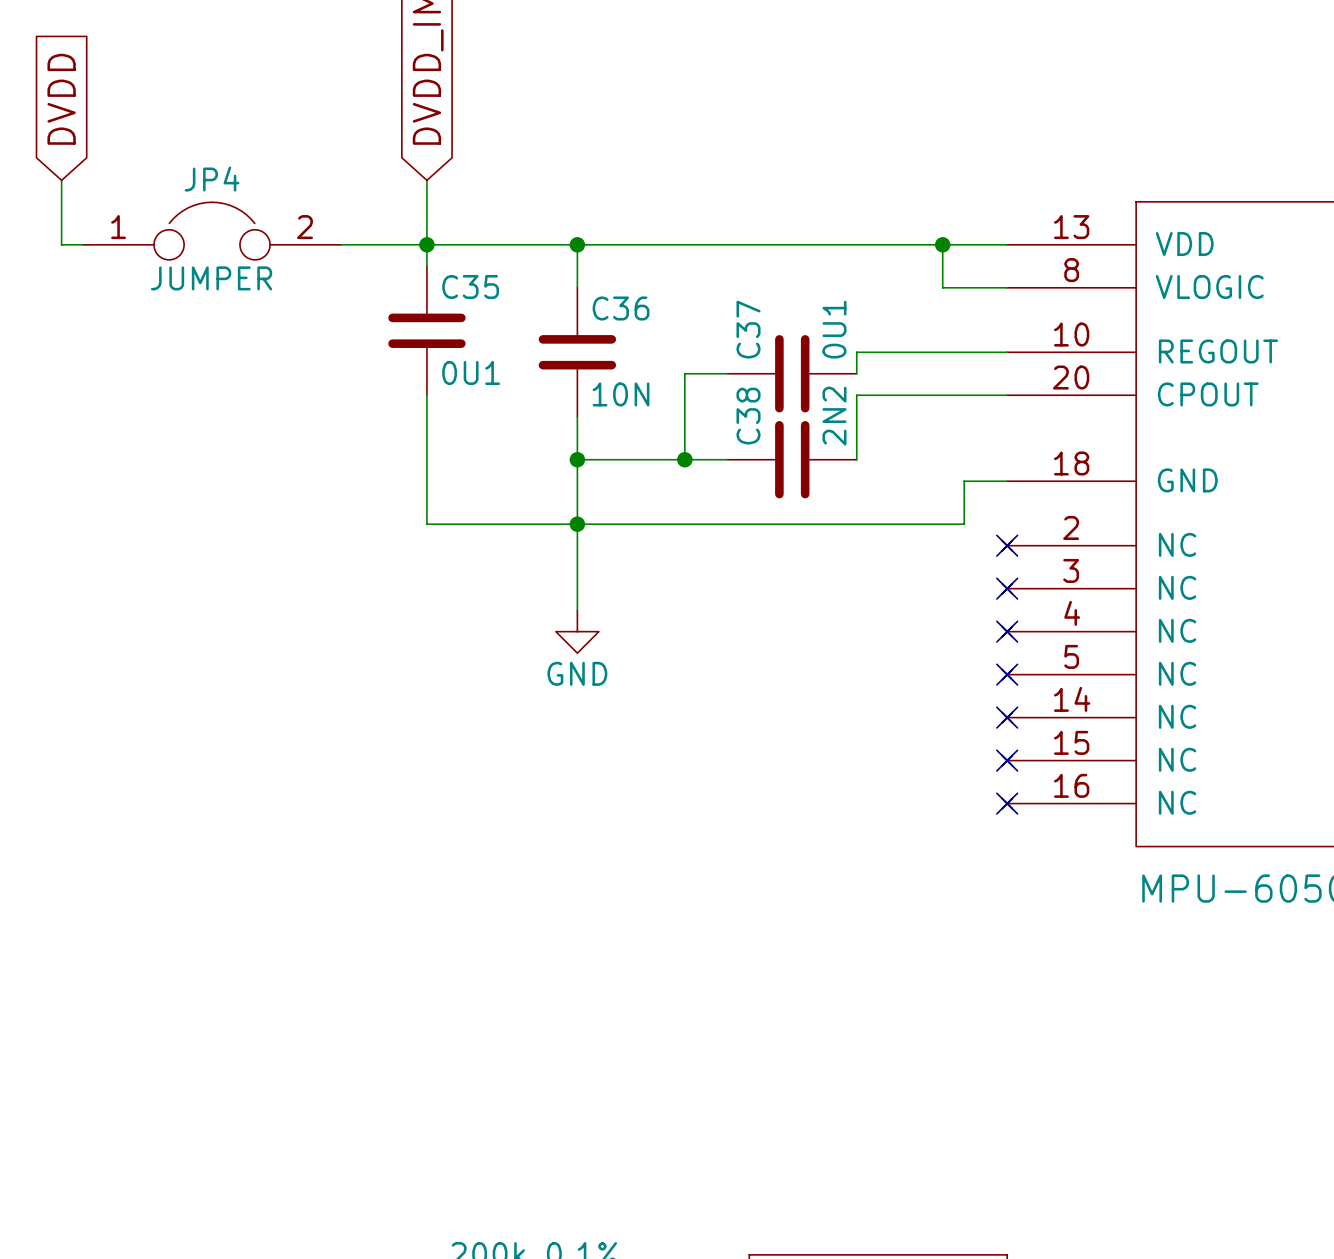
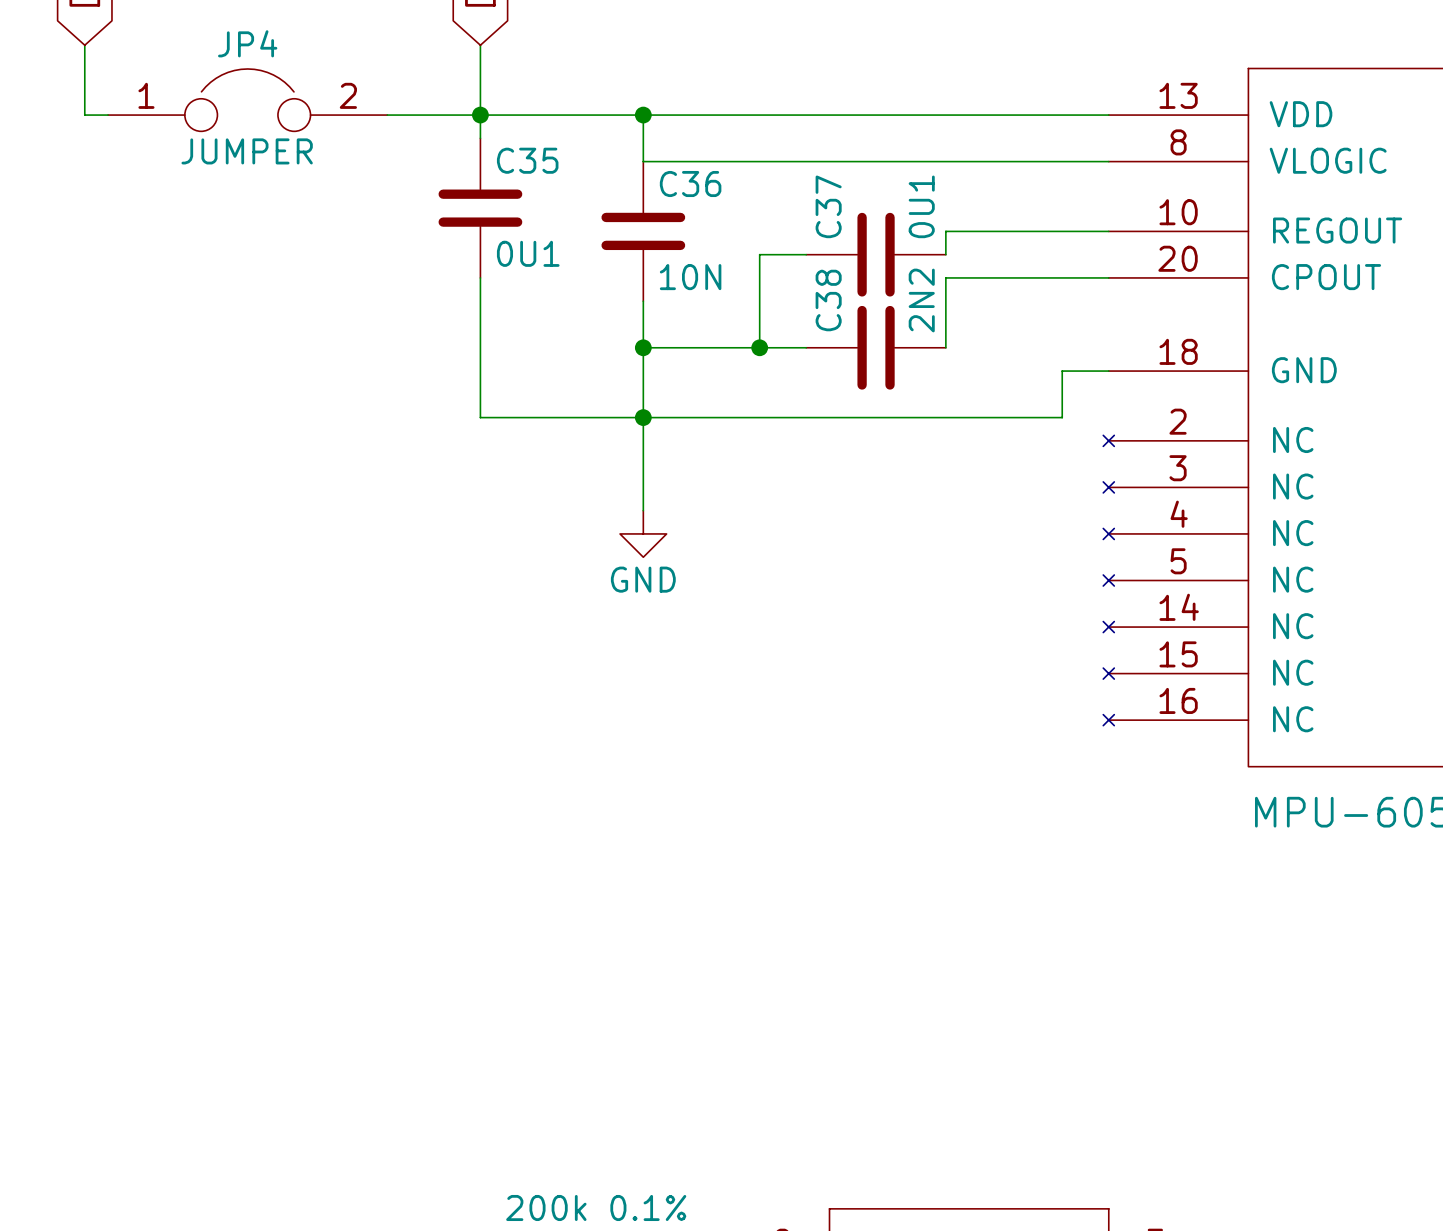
wire: (942, 244) (942, 287) -> (643, 161) (1038, 161)
junction: (942, 244) -> none
no-connect mark: (1007, 545) -> none
no-connect mark: (1007, 588) -> none
no-connect mark: (1007, 631) -> none
no-connect mark: (1007, 674) -> none
no-connect mark: (1007, 717) -> none
no-connect mark: (1007, 760) -> none
no-connect mark: (1007, 803) -> none

